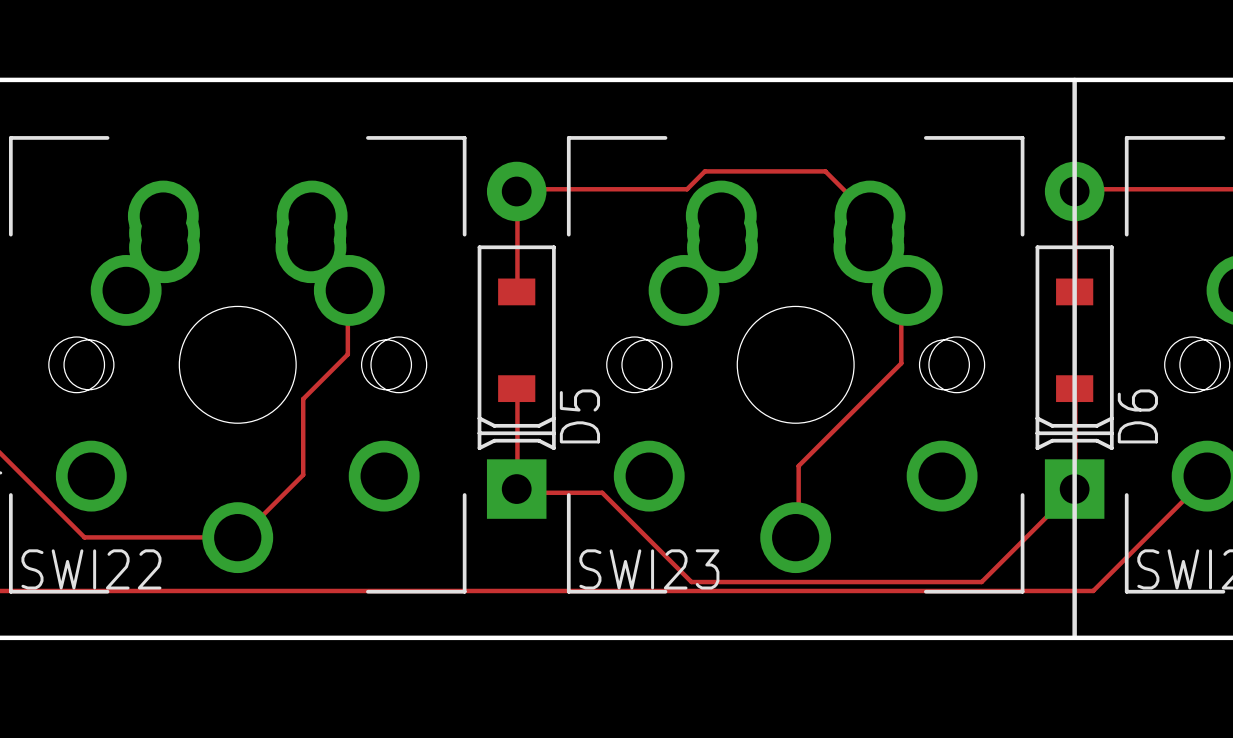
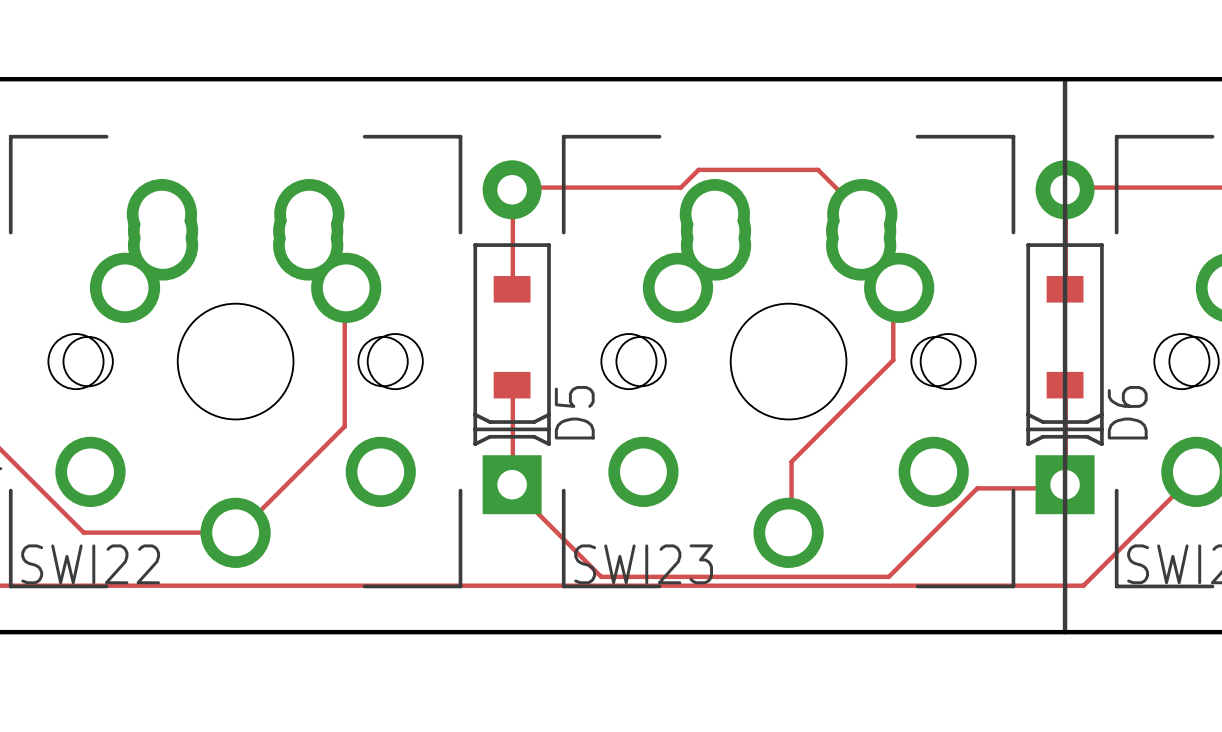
track: (347, 354) (303, 399) (303, 474) -> (344, 351) (344, 426) (300, 470)
track: (517, 492) (602, 492) (691, 582) -> (512, 488) (601, 576) (685, 576)
track: (1070, 492) (981, 582) (896, 582) -> (1061, 488) (977, 488) (888, 576)

